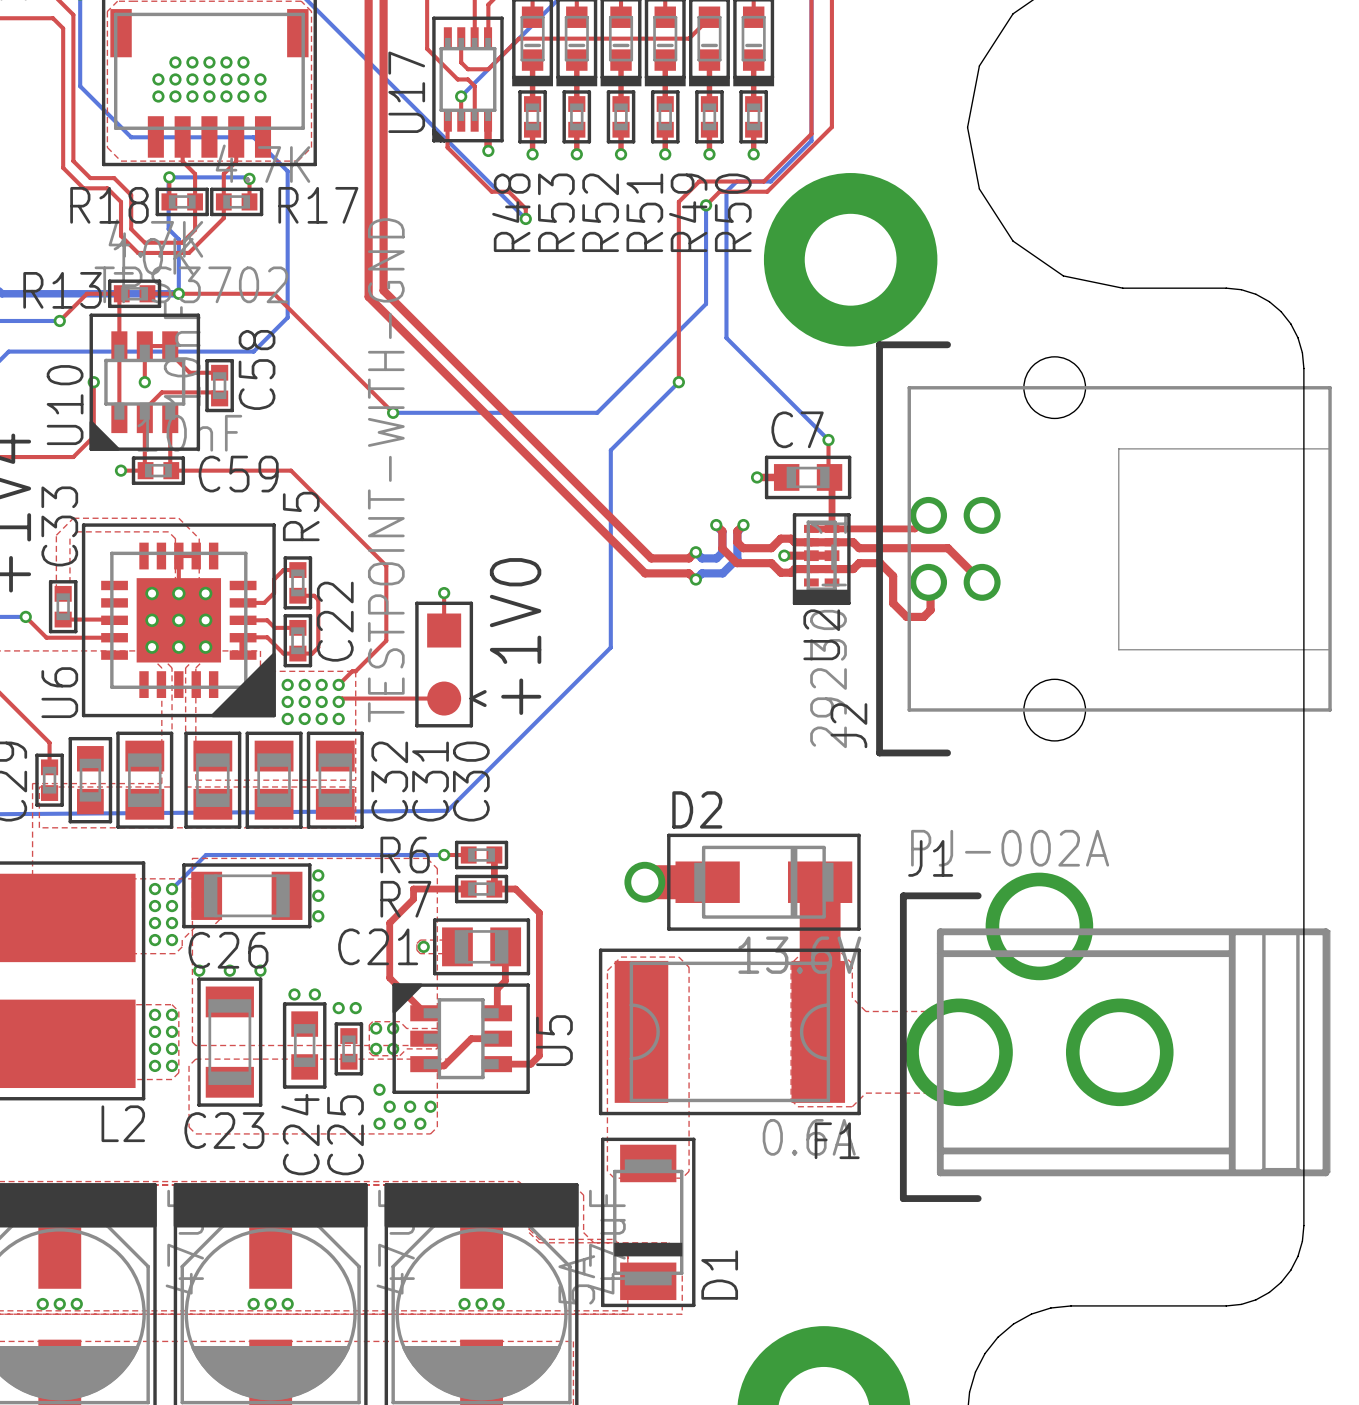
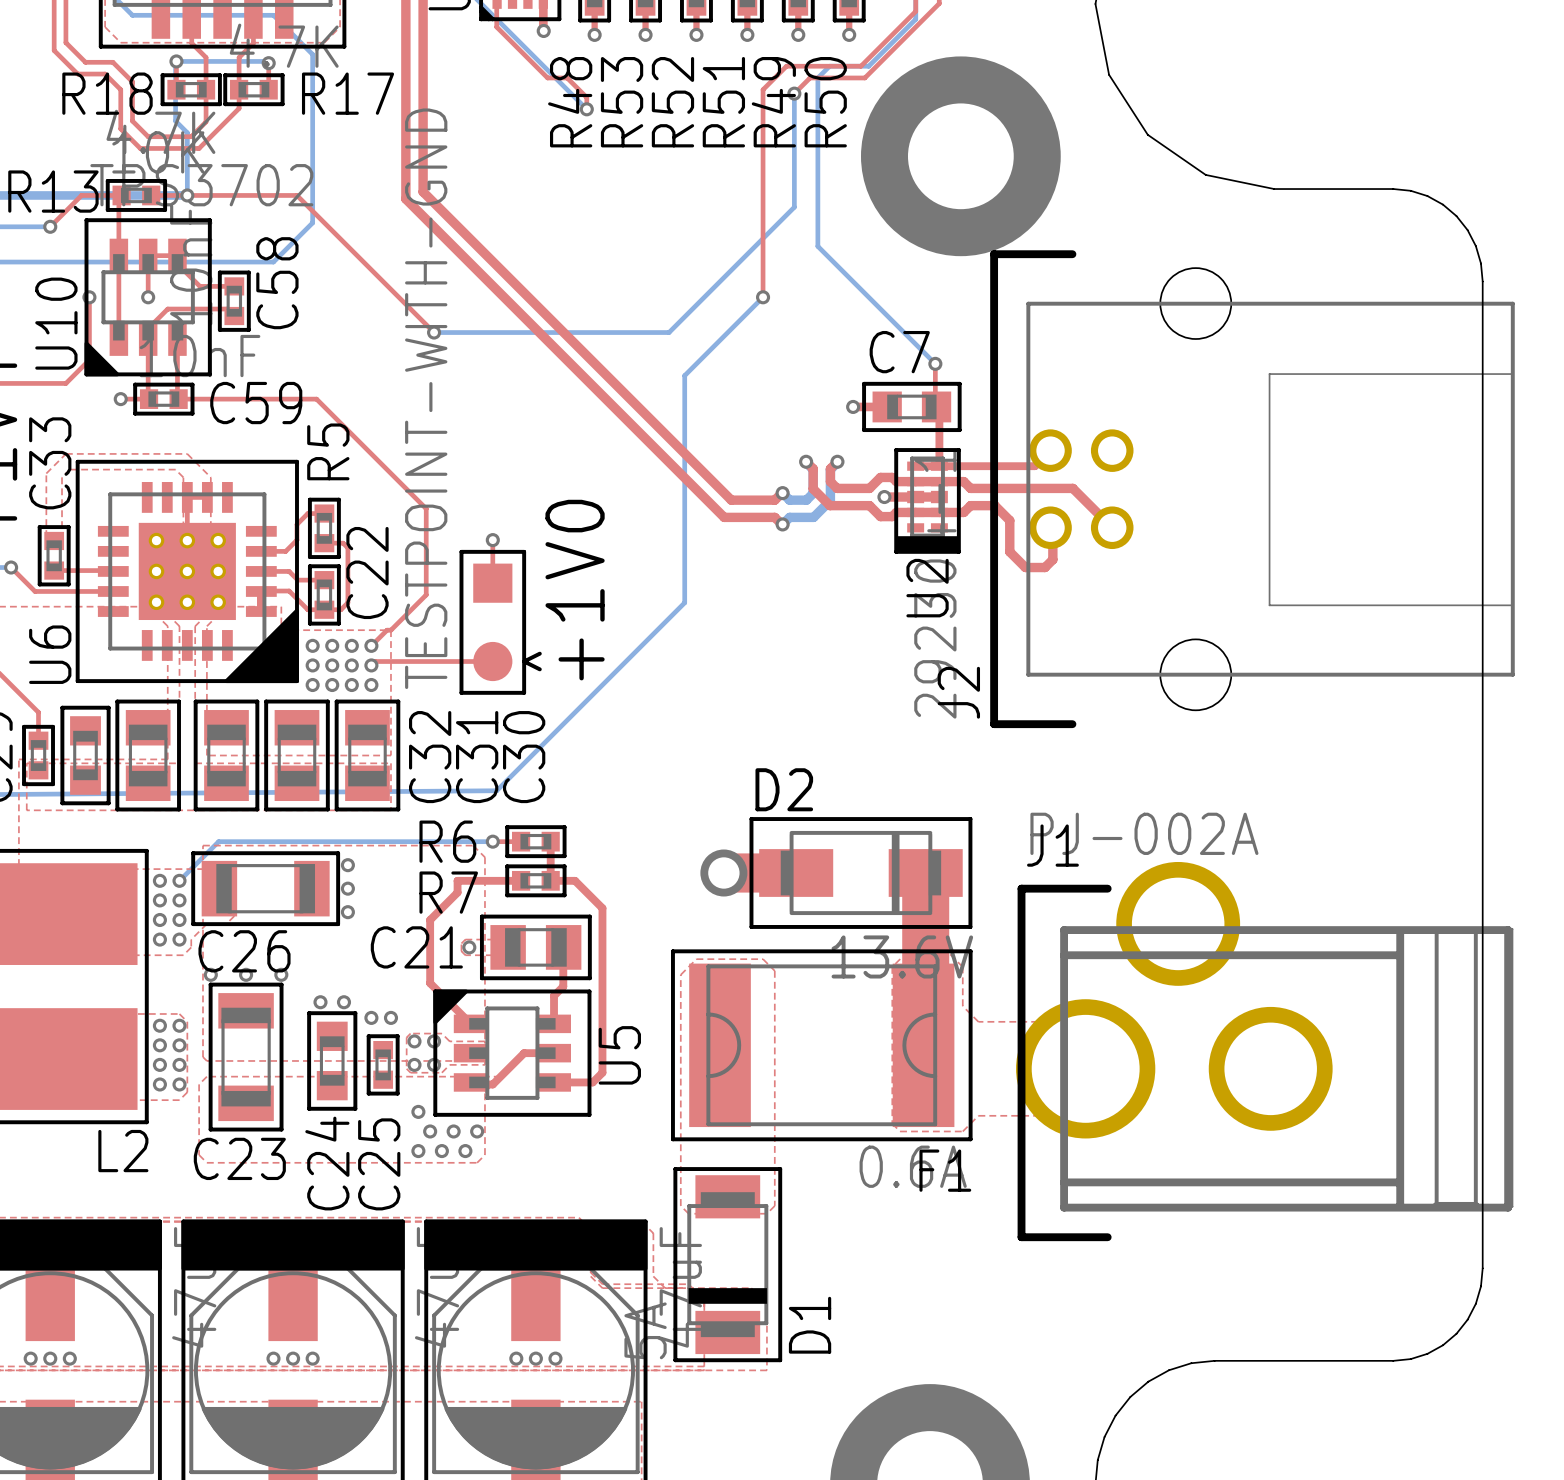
J1 footprint: [899, 872, 1330, 1202] -> [1016, 861, 1513, 1242]

